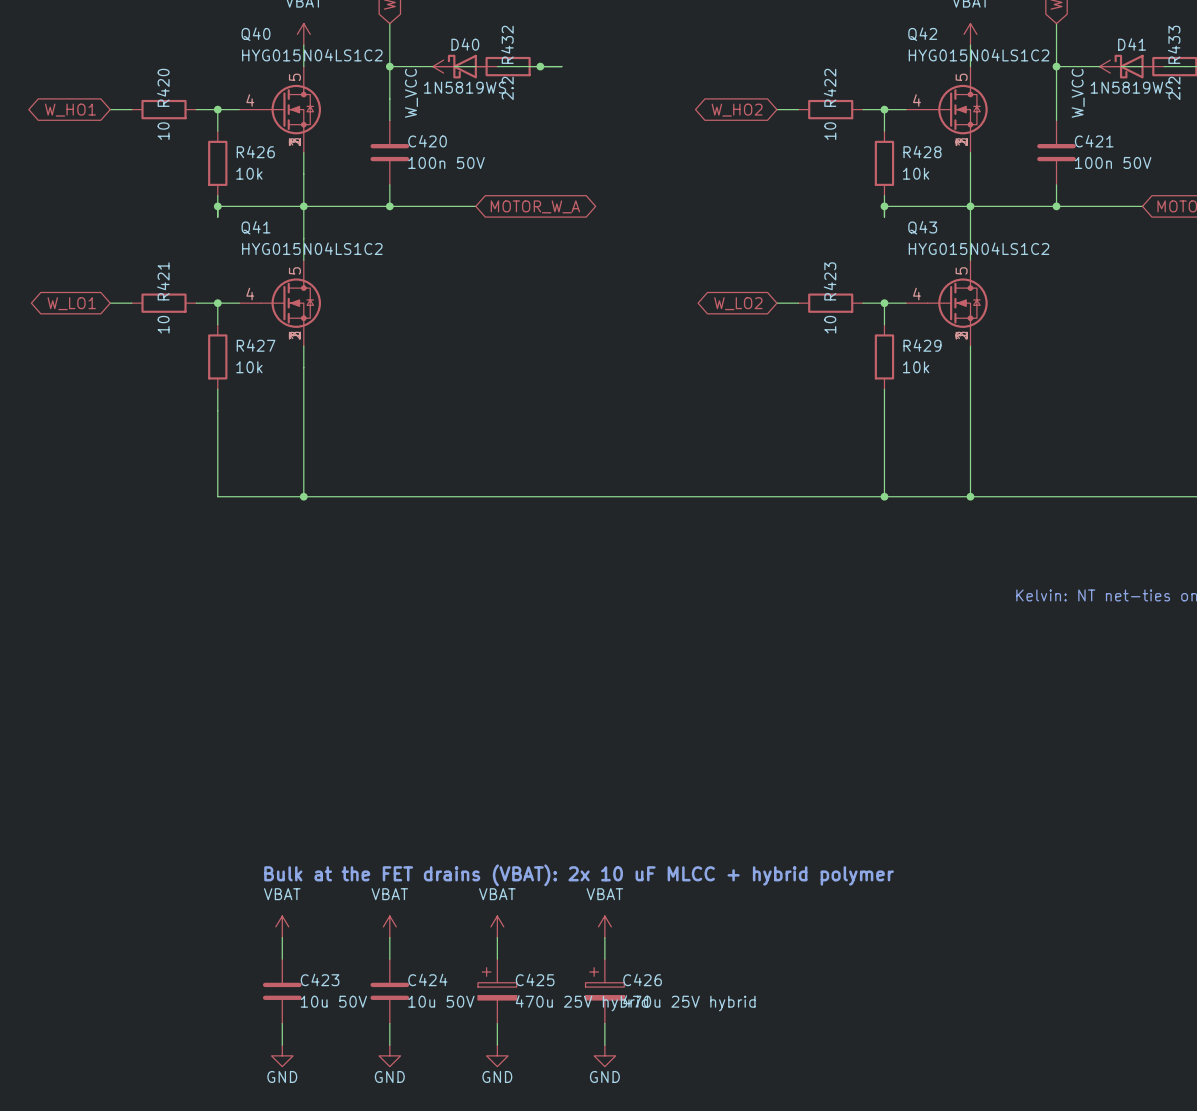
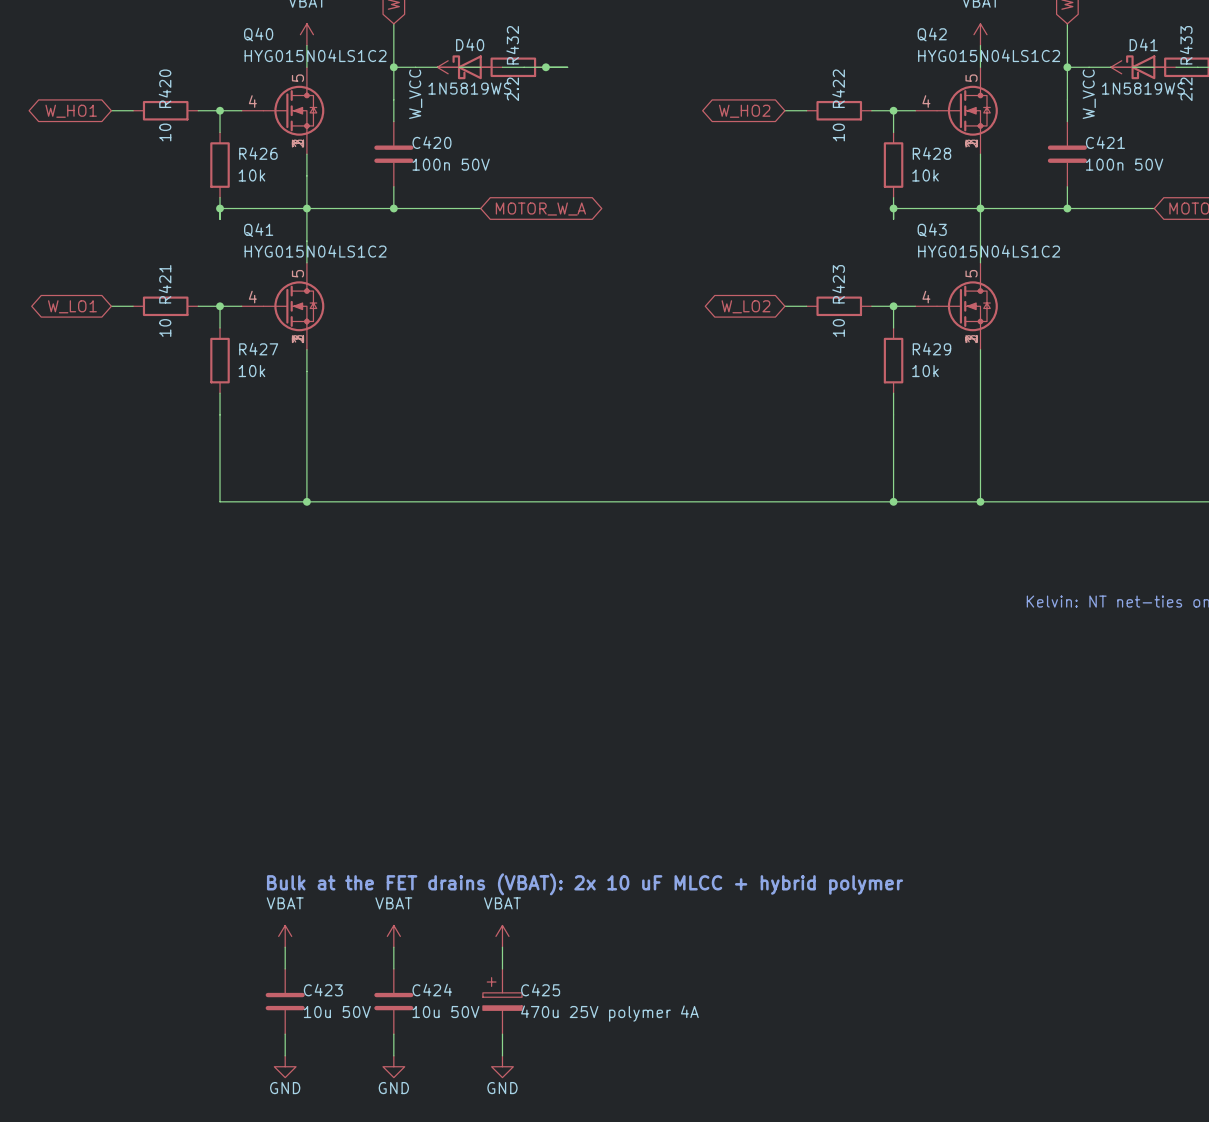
power symbol: VBAT (604, 926) -> none
wire: (604, 937) (604, 959) -> none
C426: 470u 25V hybrid (604, 991) -> none
C425 value: 470u 25V hybrid (581, 1003) -> 470u 25V polymer 4A (609, 1013)
wire: (604, 1023) (604, 1045) -> none
power symbol: GND (604, 1055) -> none

